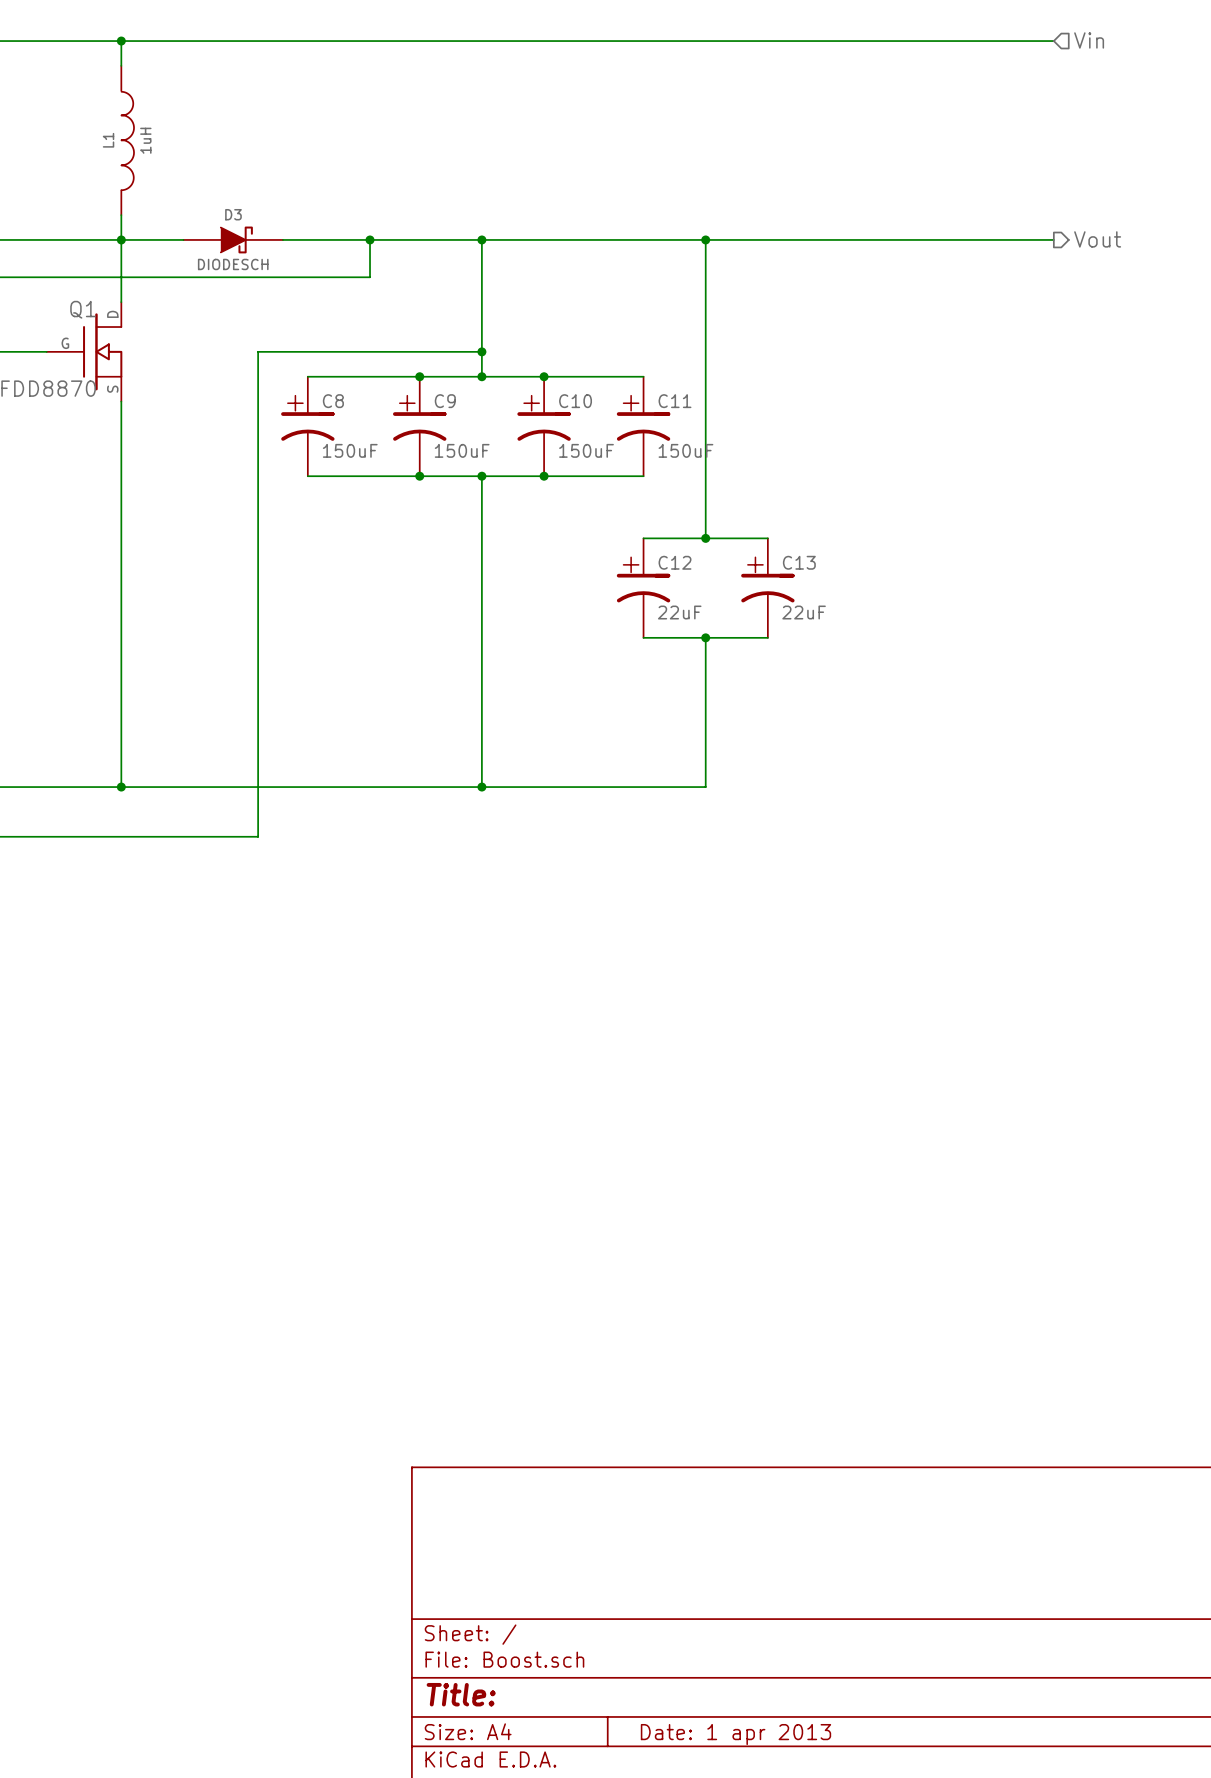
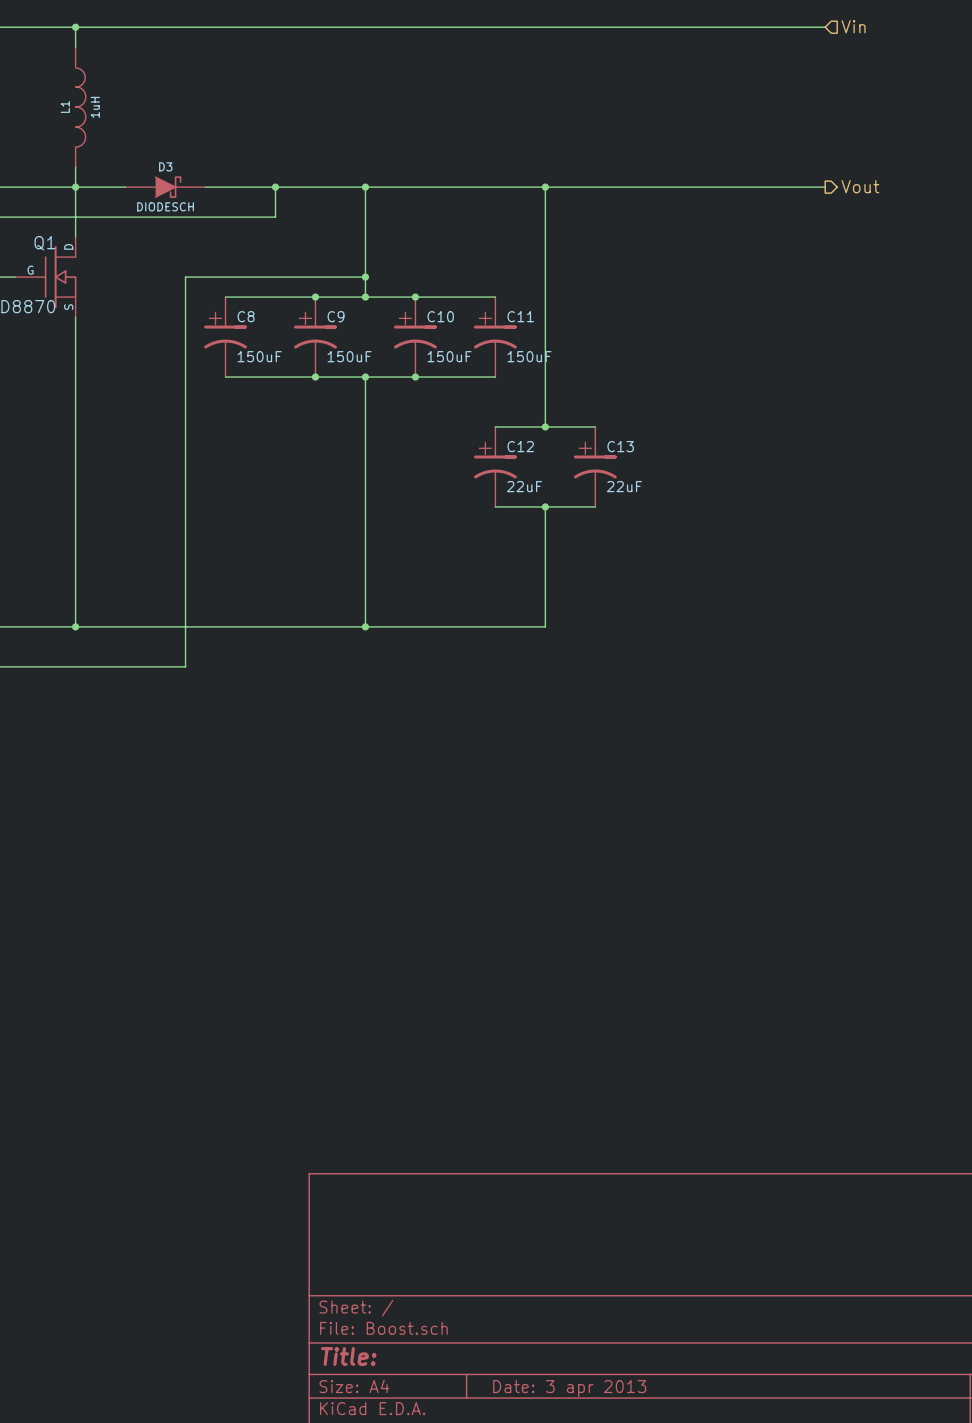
title block: Date: 1 apr 2013 (735, 1734) -> Date: 3 apr 2013 (569, 1388)

